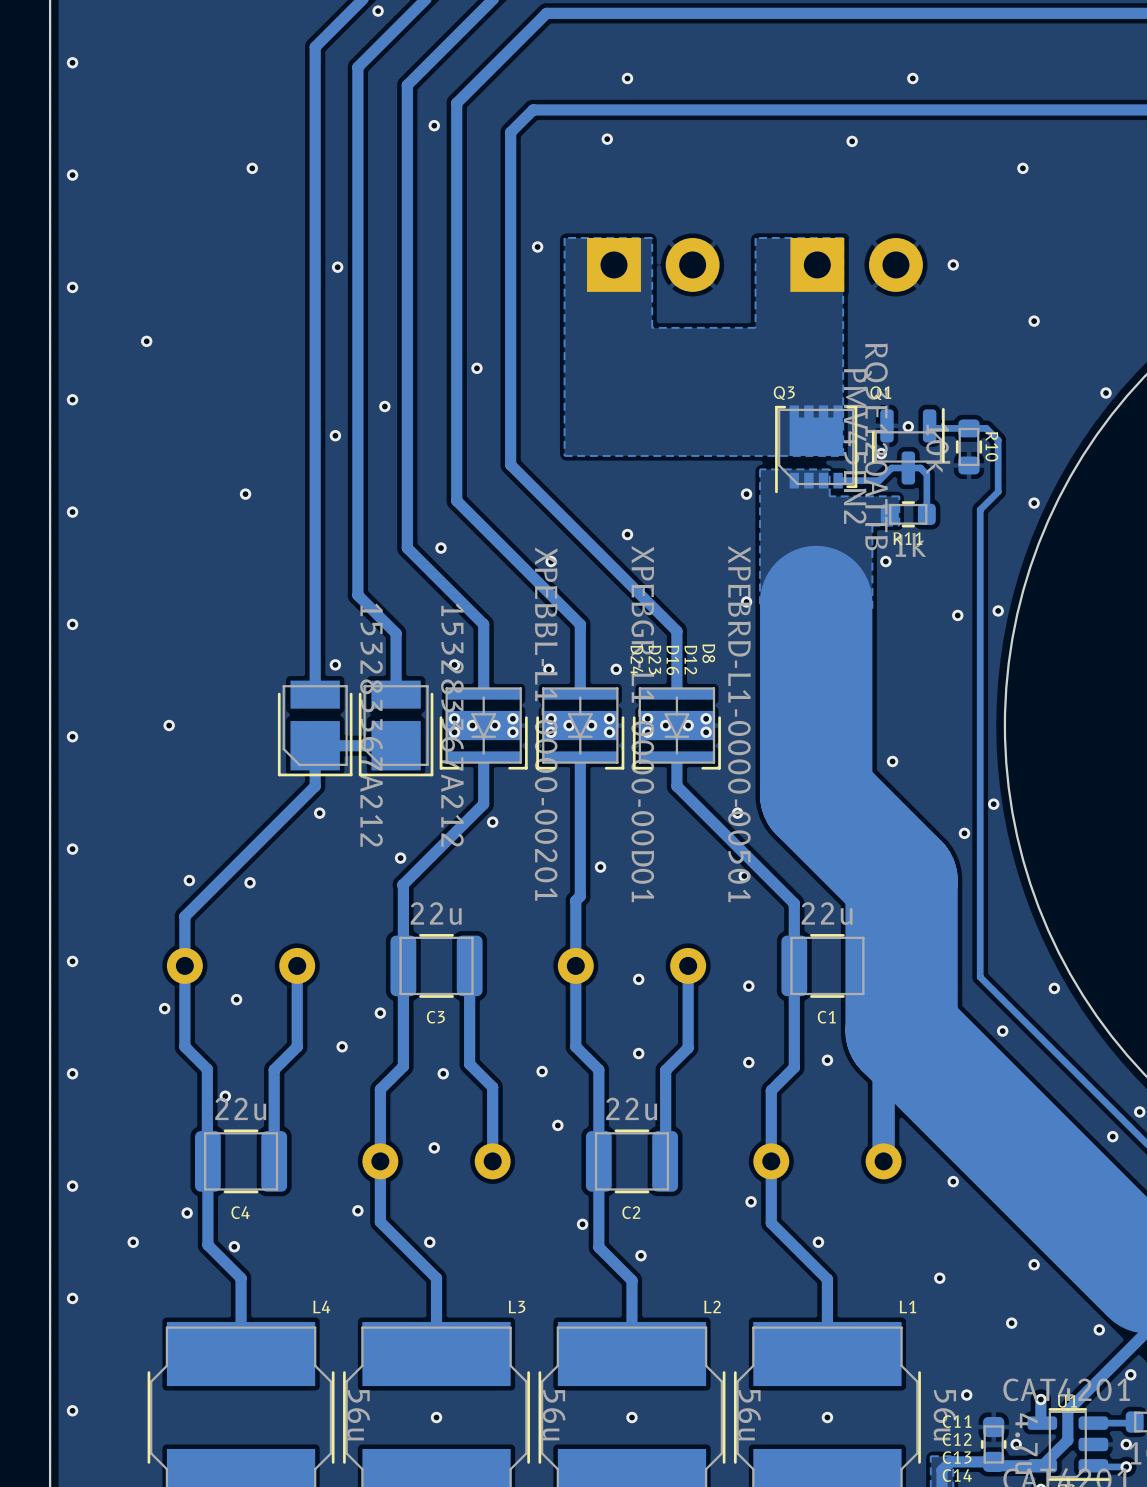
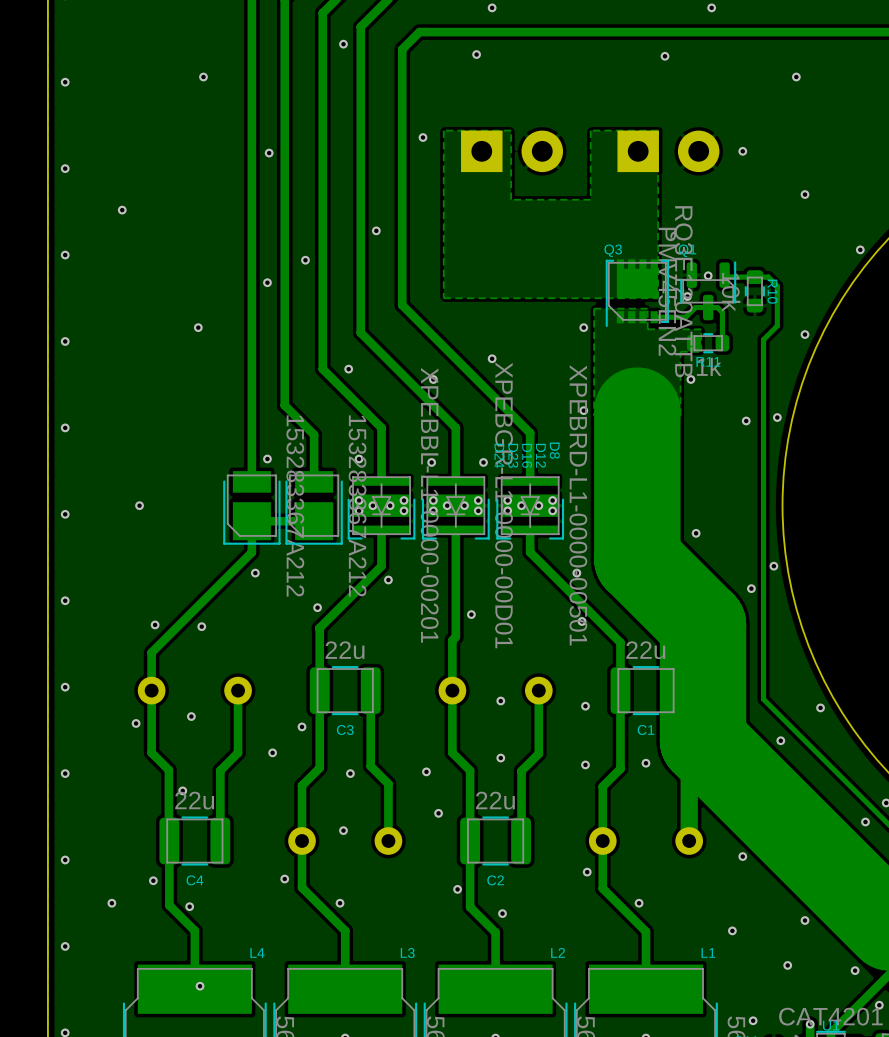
via: none -> (200, 986)

